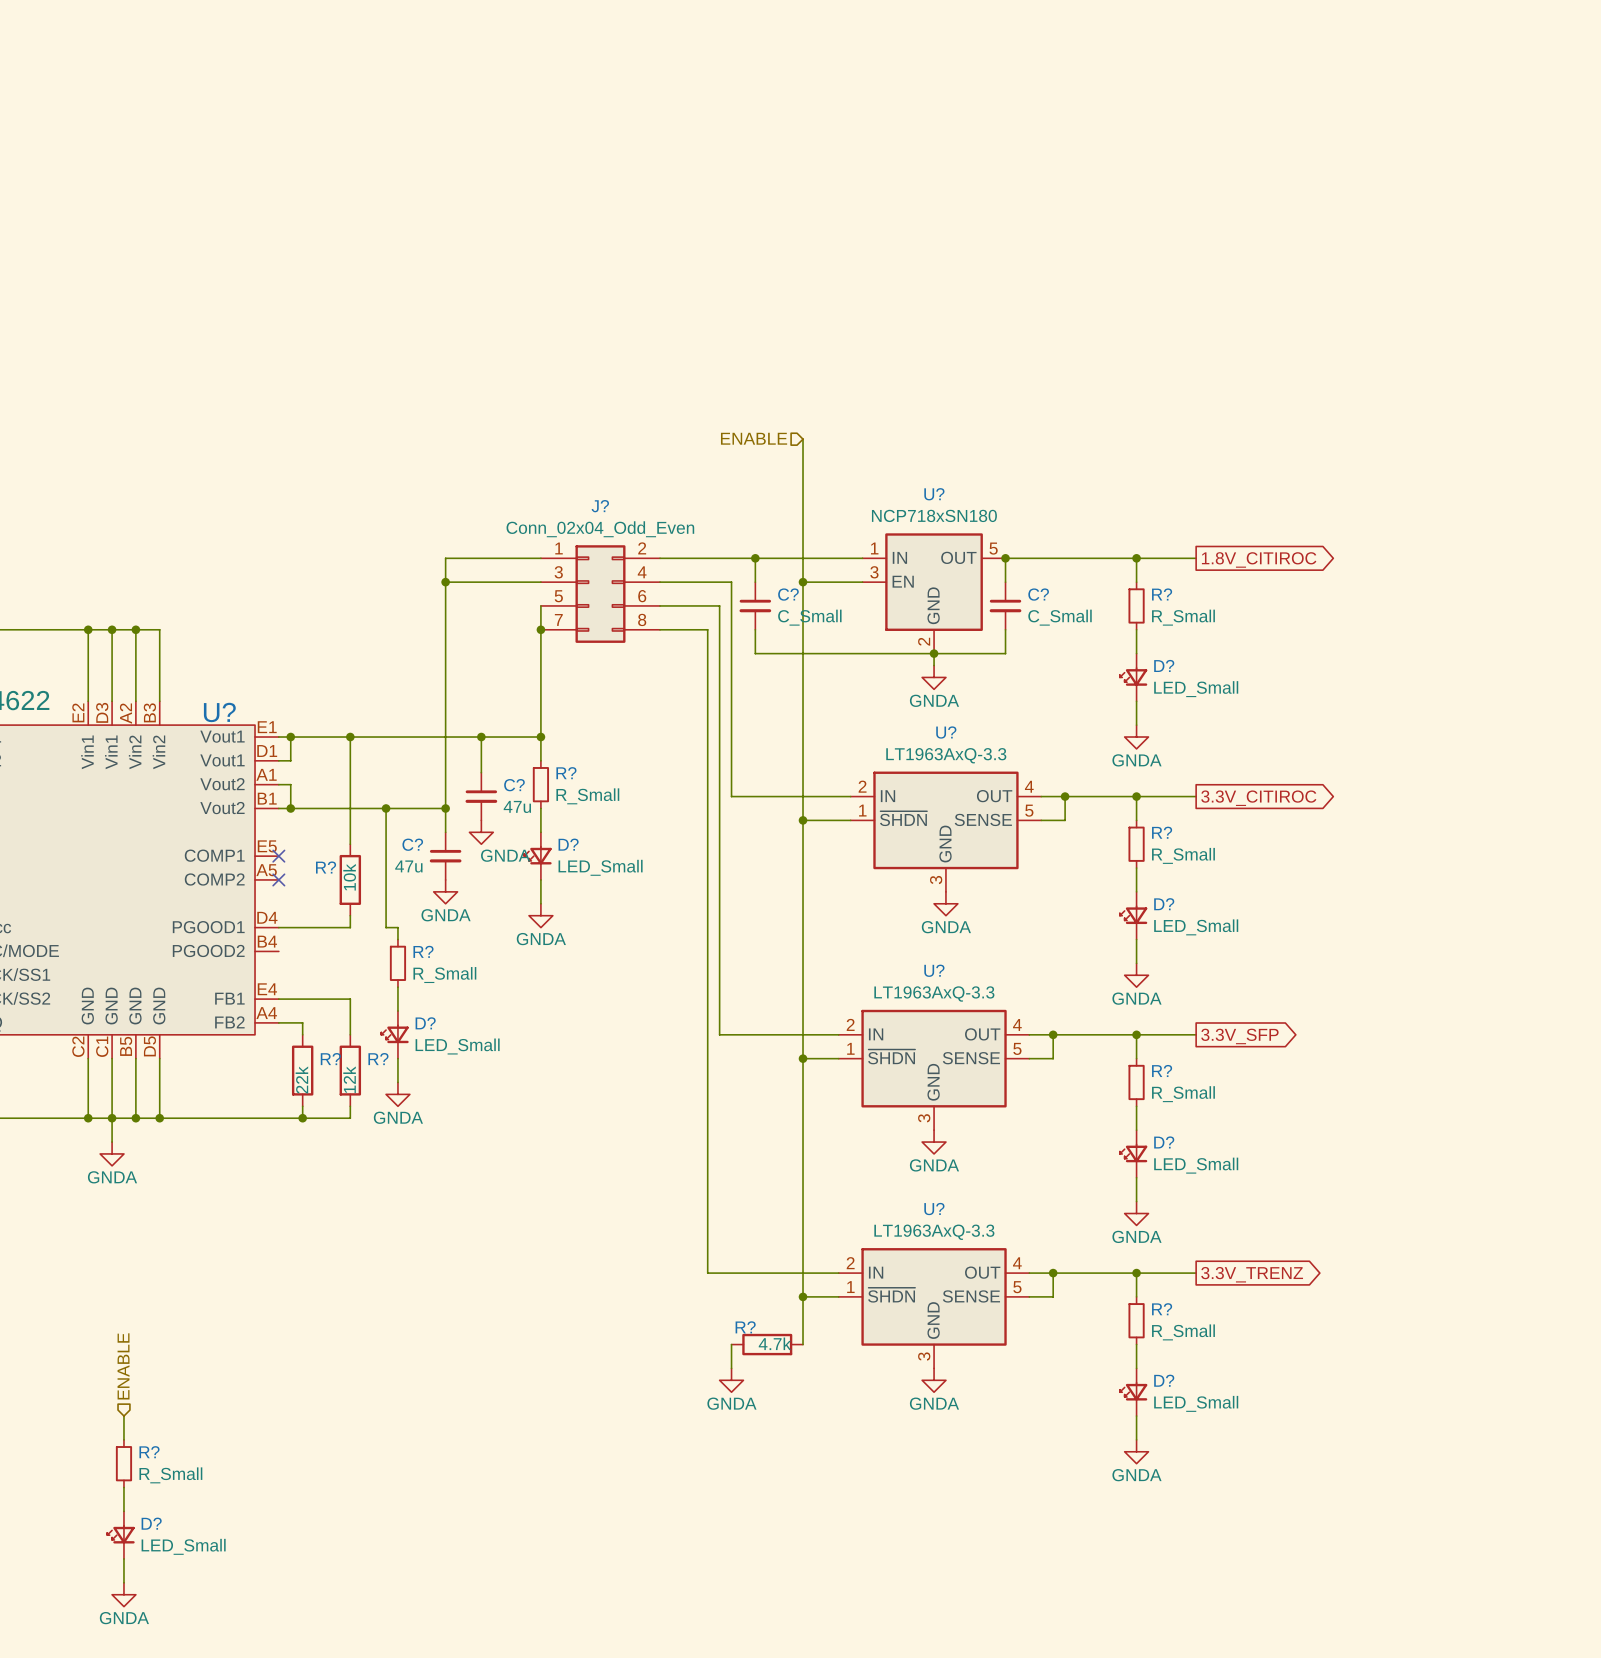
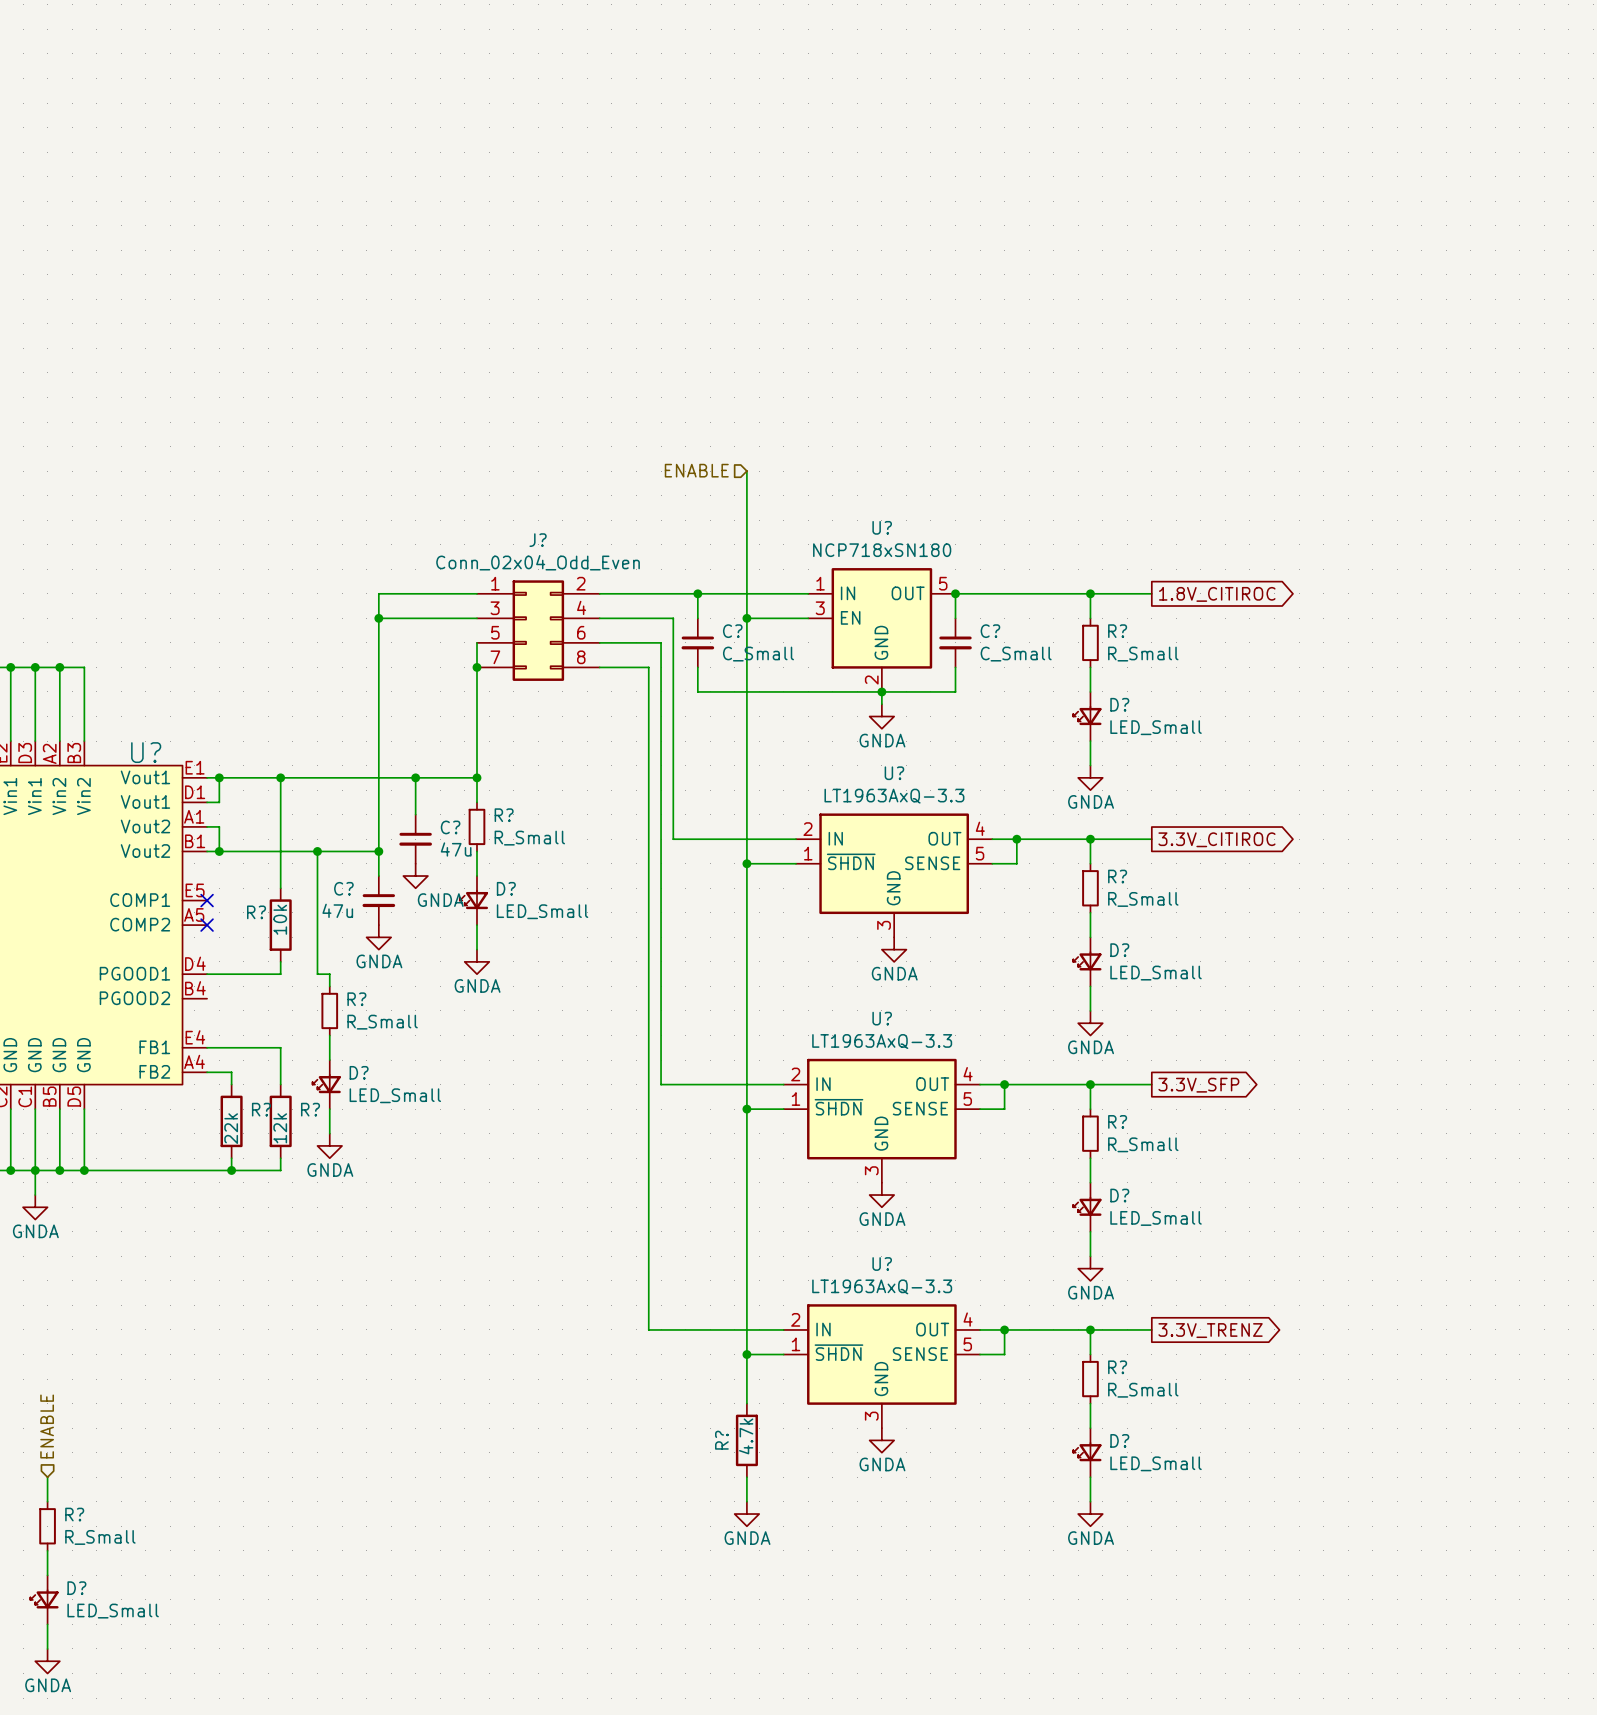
R? name position: R? (745, 1327) -> R? (721, 1440)
wire: (731, 1344) (731, 1368) -> (746, 1477) (746, 1501)
R? rotation: 0° (767, 1344) -> 90° clockwise (746, 1440)
R? position: (767, 1344) -> (746, 1440)
power symbol position: GNDA (731, 1380) -> GNDA (746, 1514)

